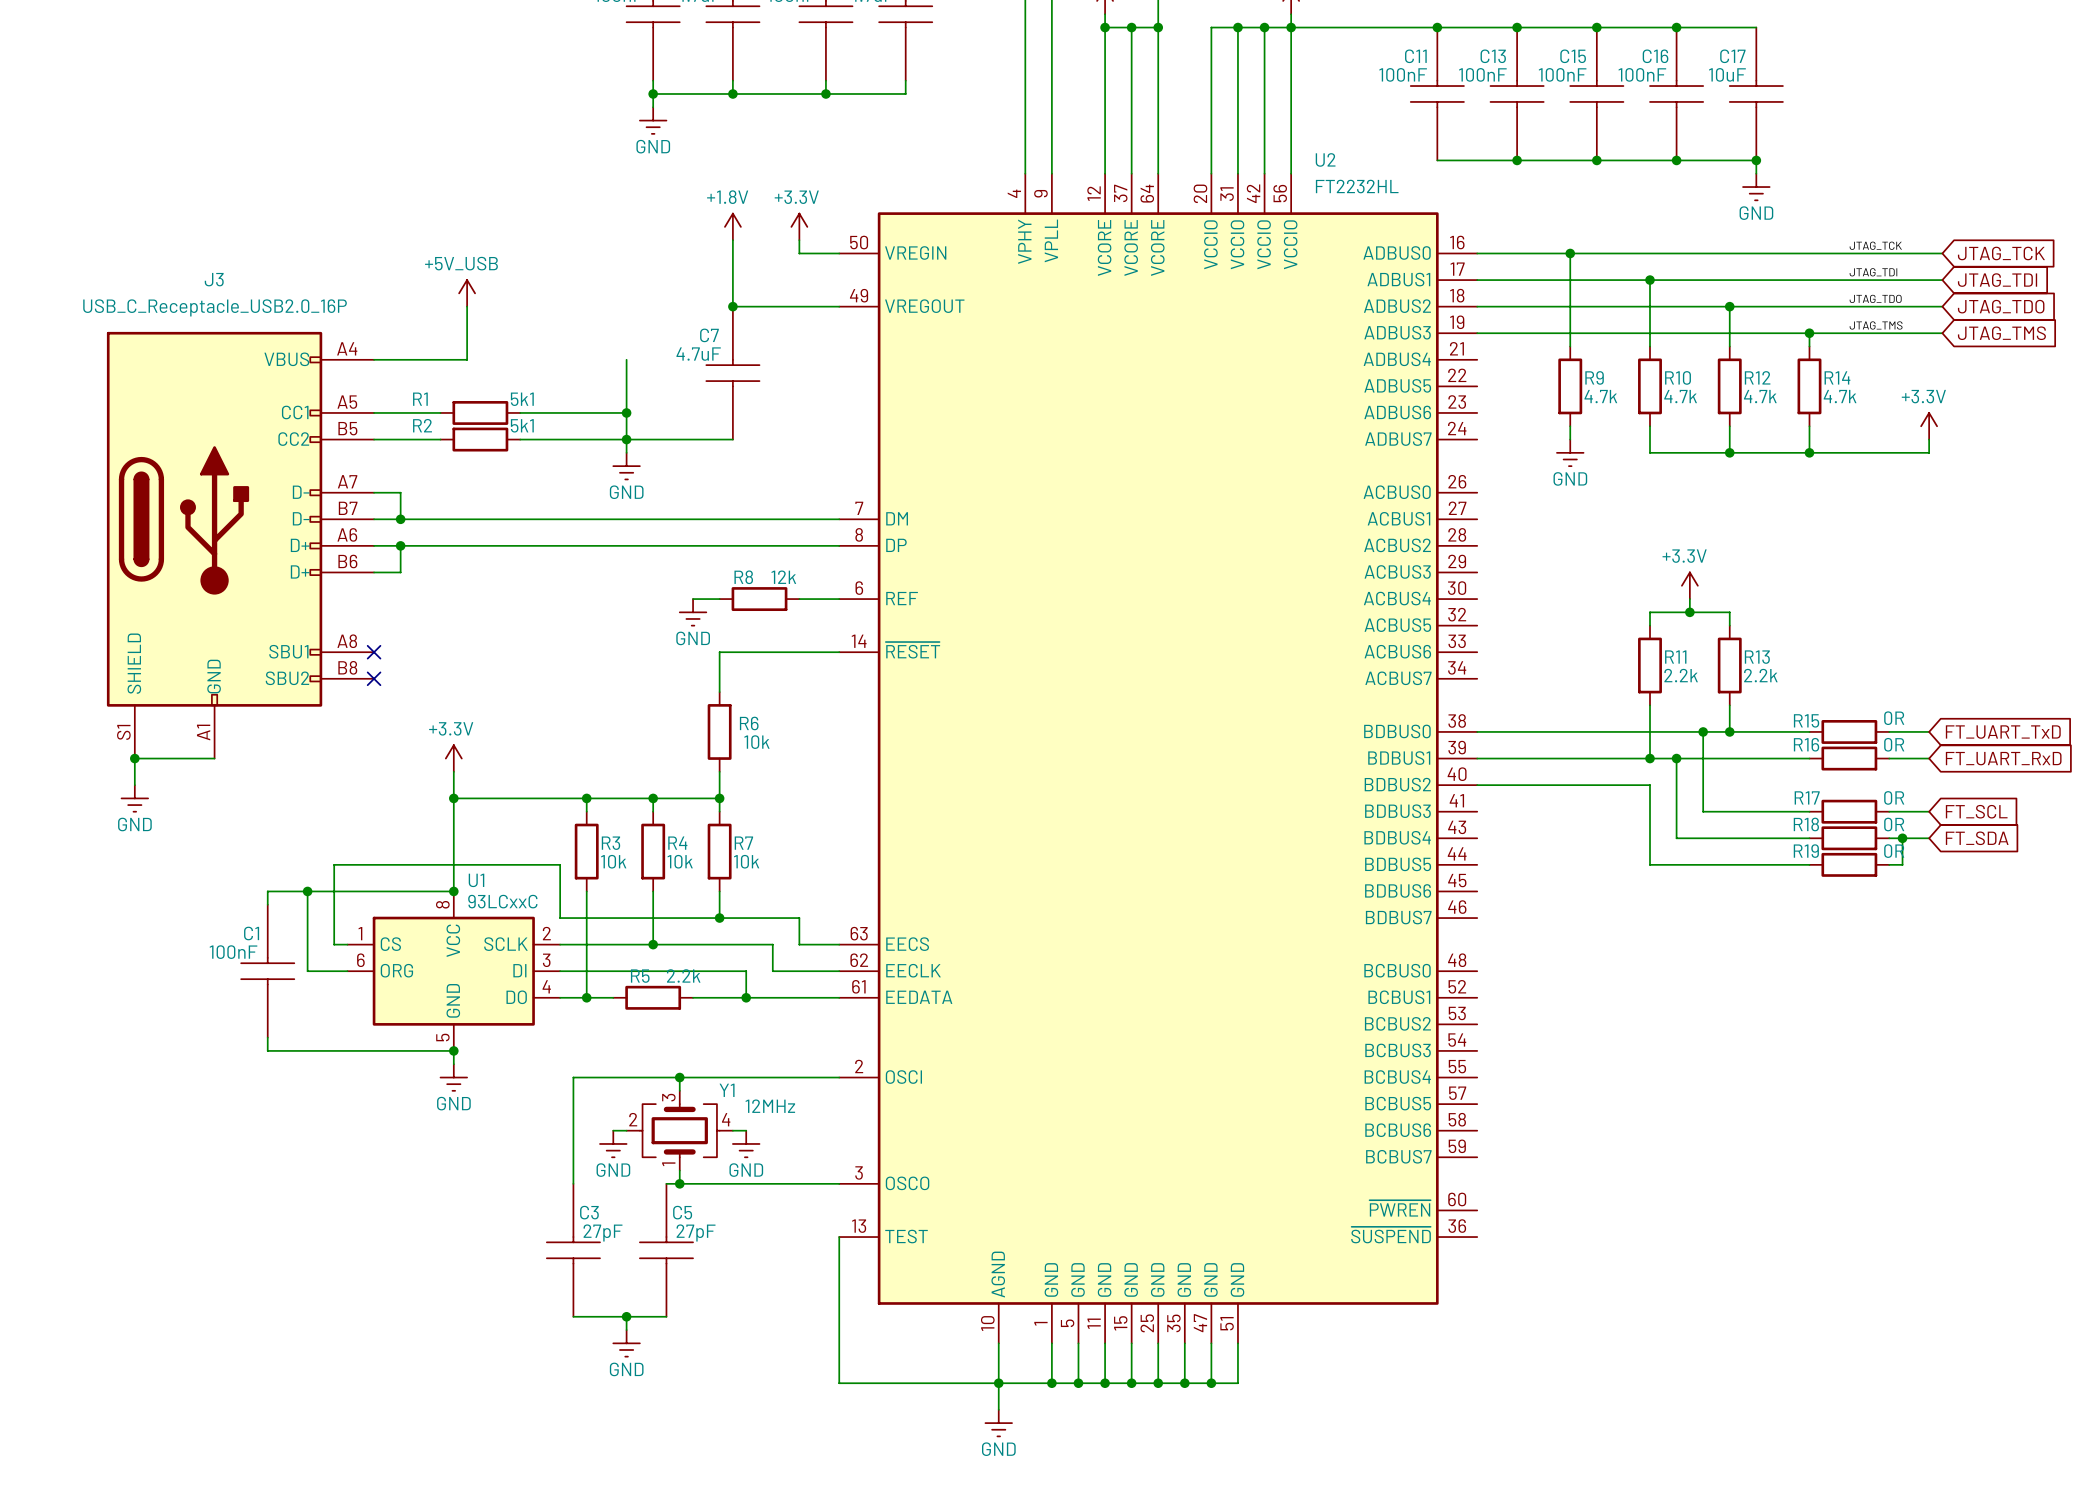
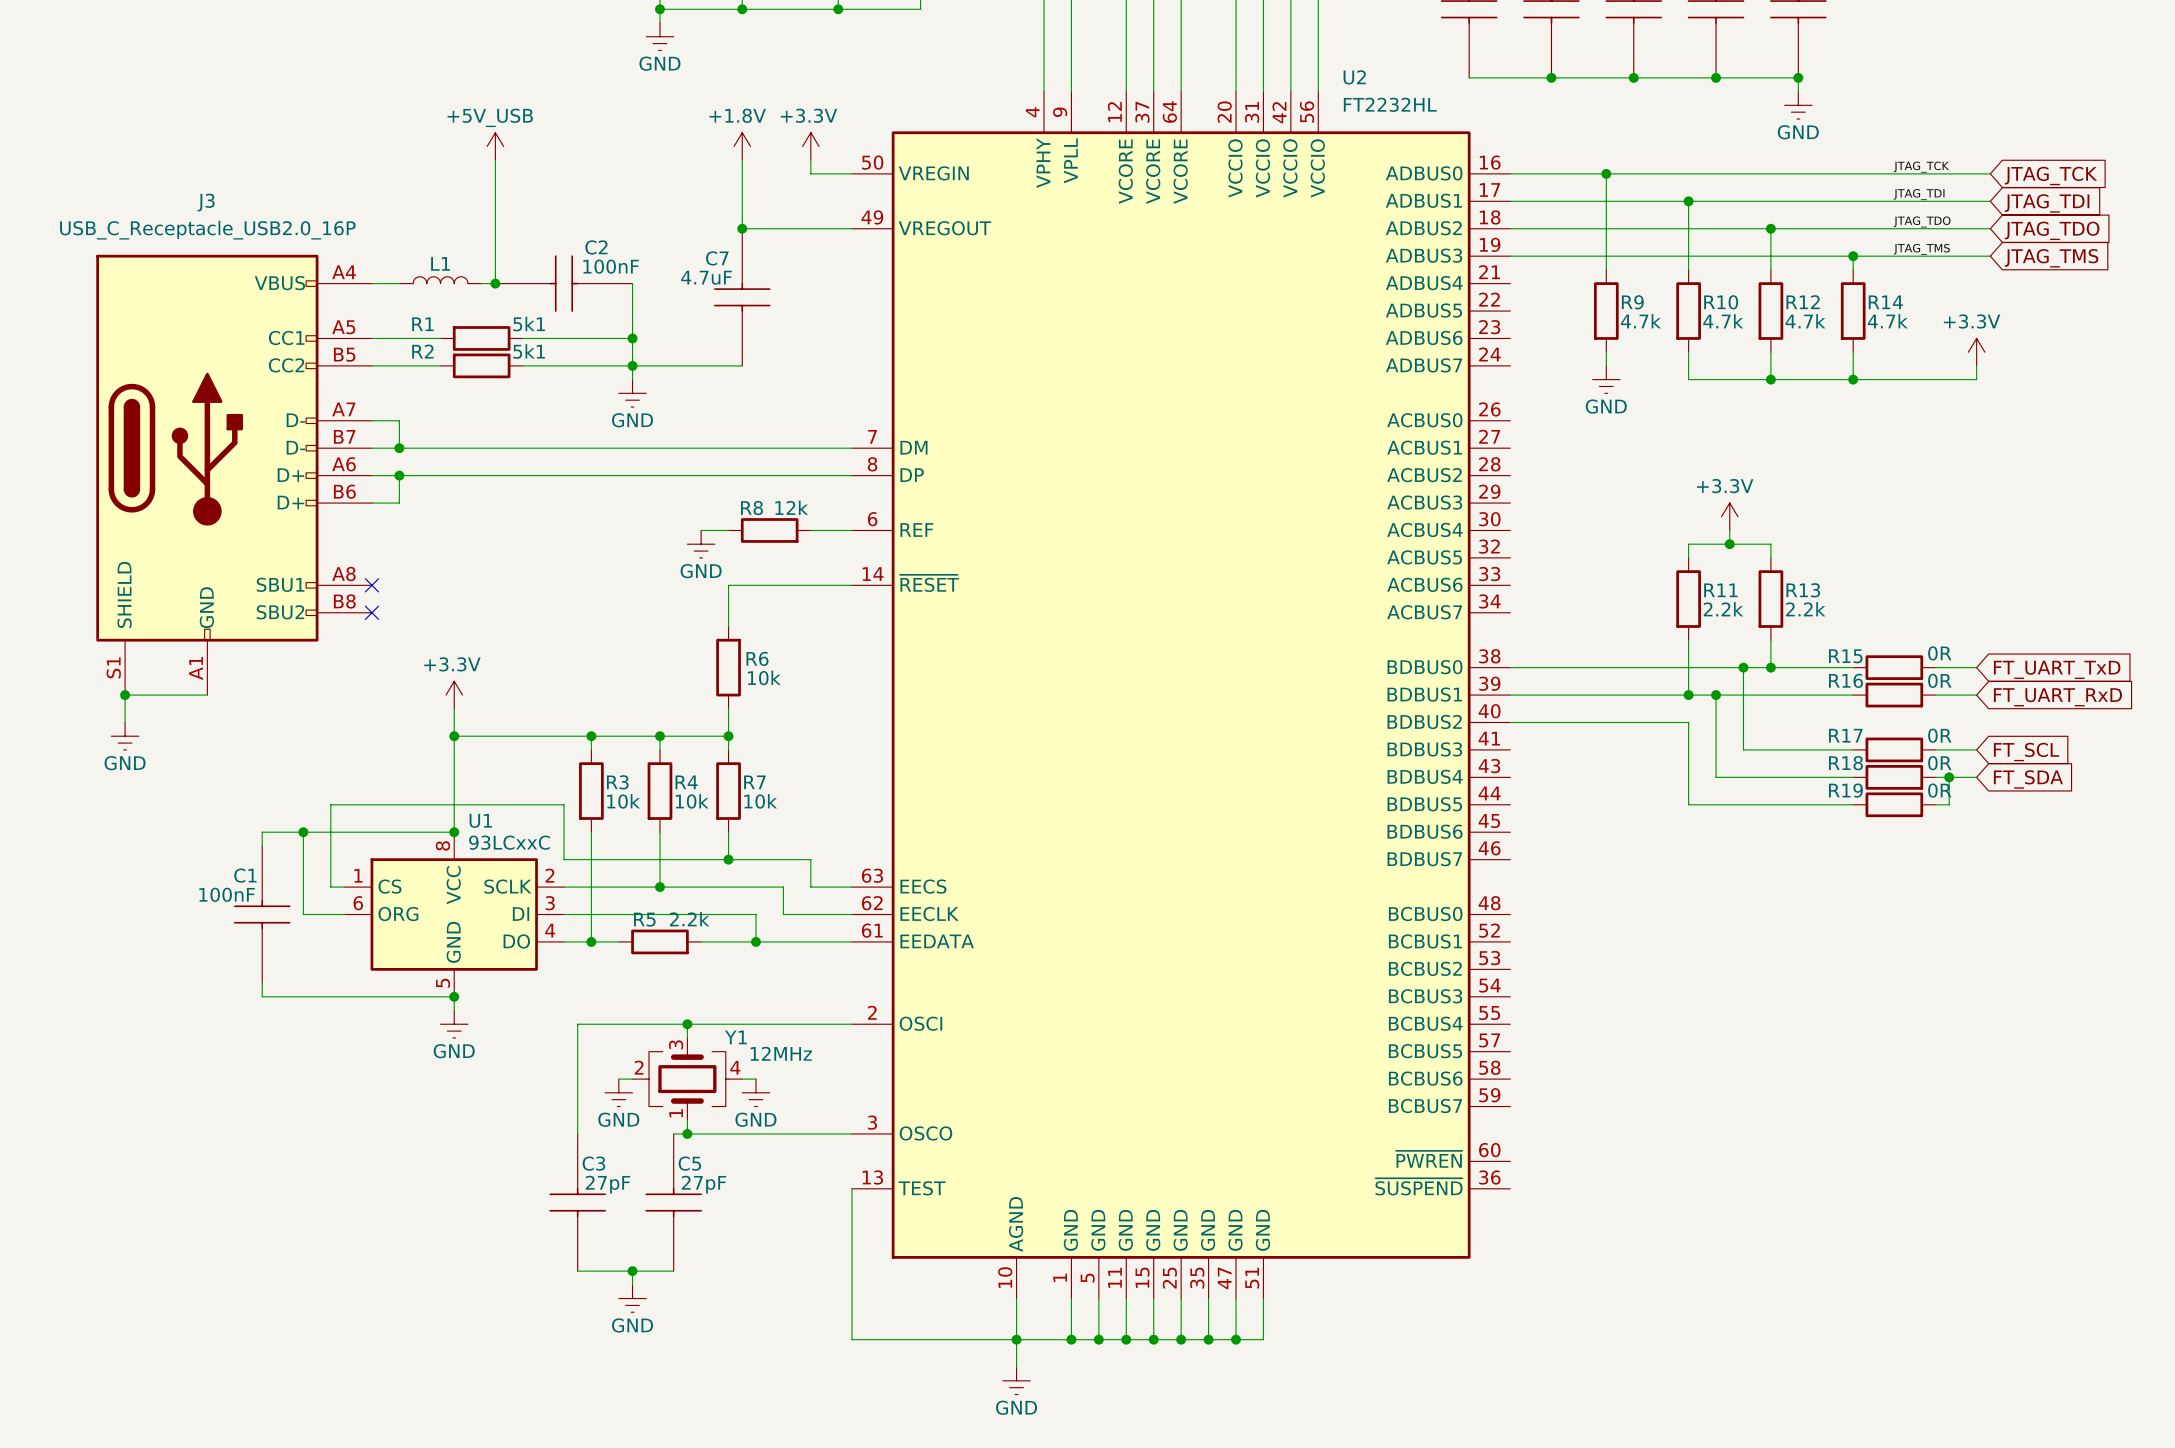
wire: none -> (495, 160) (495, 283) (481, 283)
power symbol position: +5V_USB (467, 293) -> +5V_USB (495, 146)
wire: (467, 306) (467, 359) (400, 359) -> none
L1: none -> (440, 280)
junction: none -> (495, 283)
C2: none -> 100nF (563, 283)

